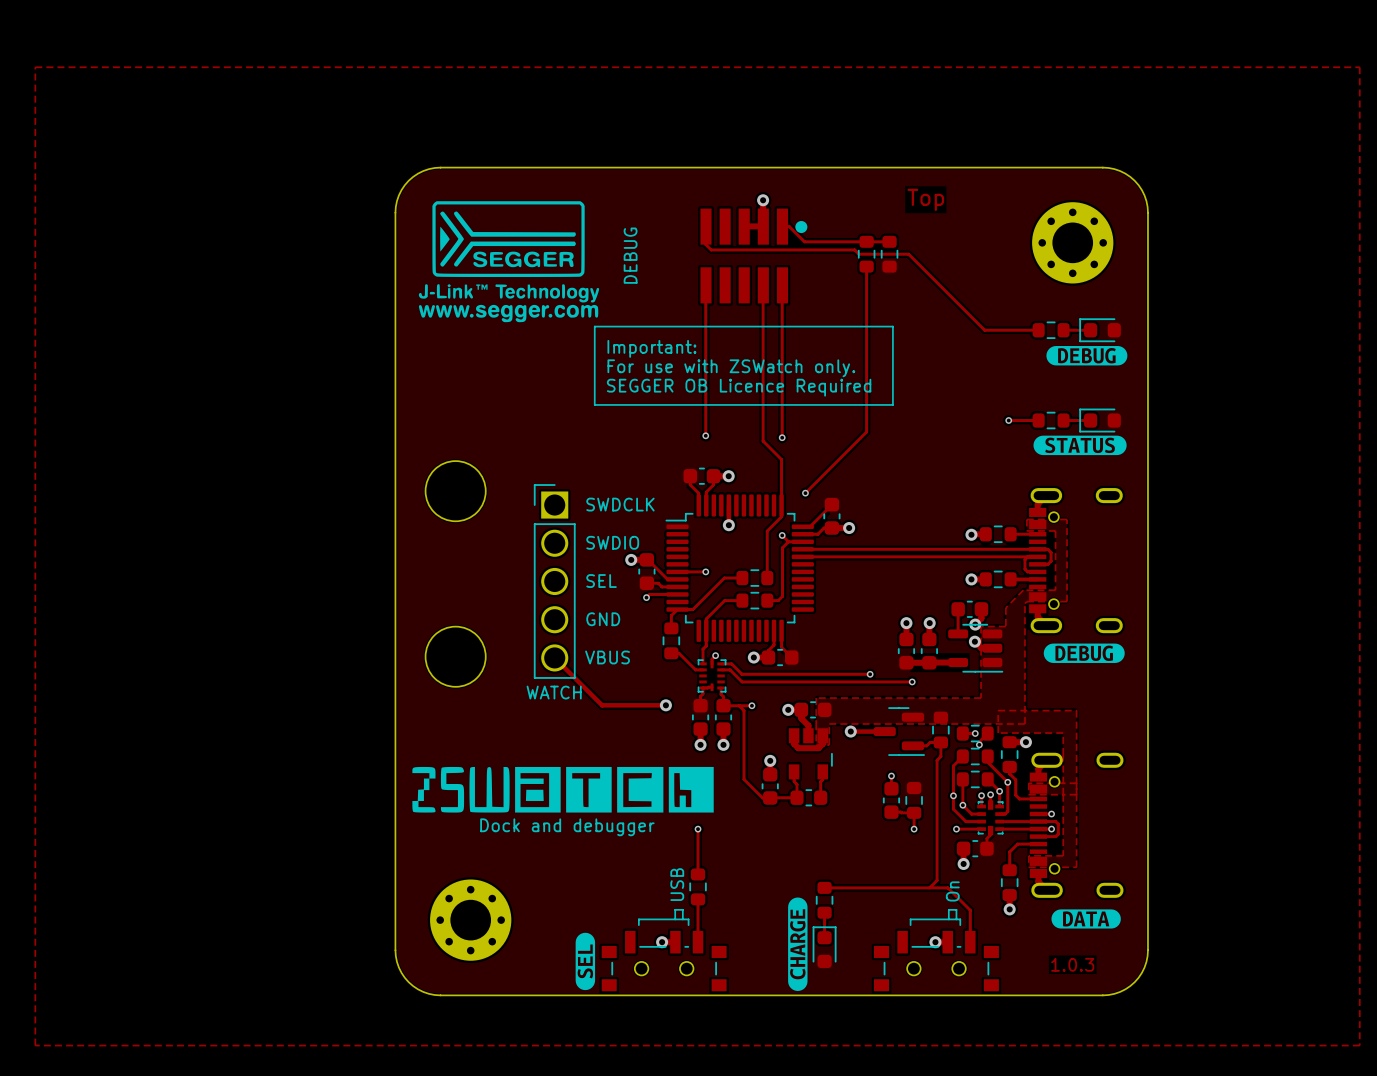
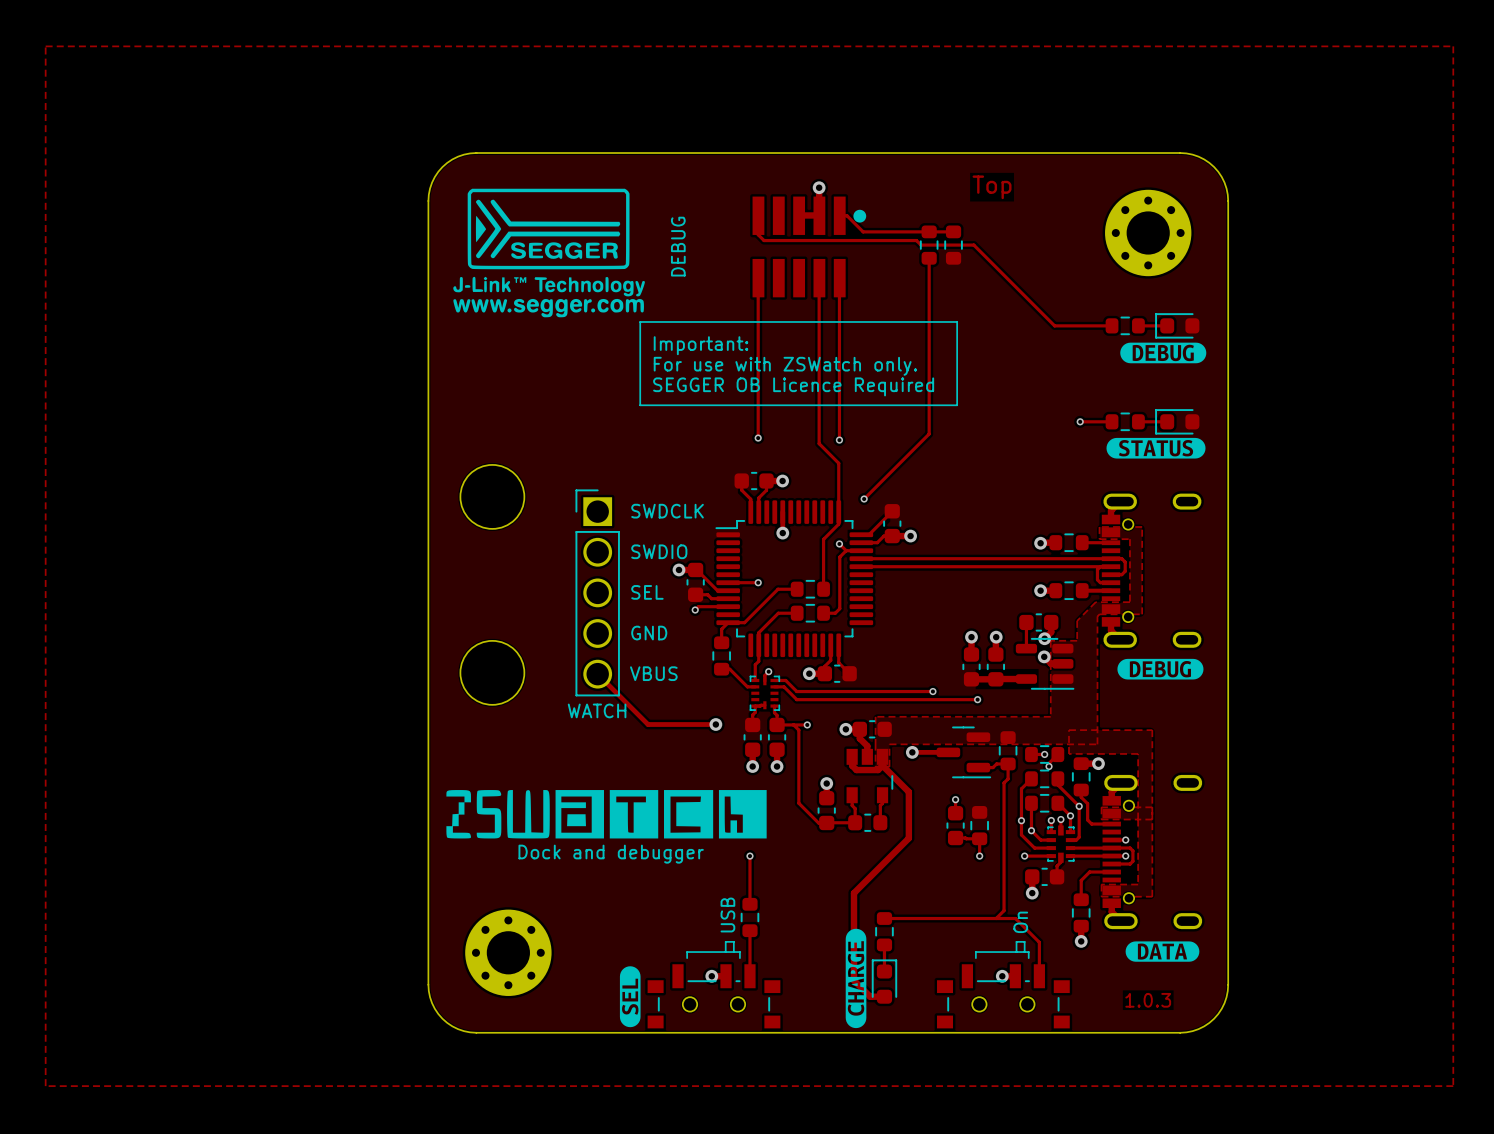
track: none -> (882, 765) (908, 791) (908, 838) (854, 893) (854, 980) (870, 996) (884, 996)

